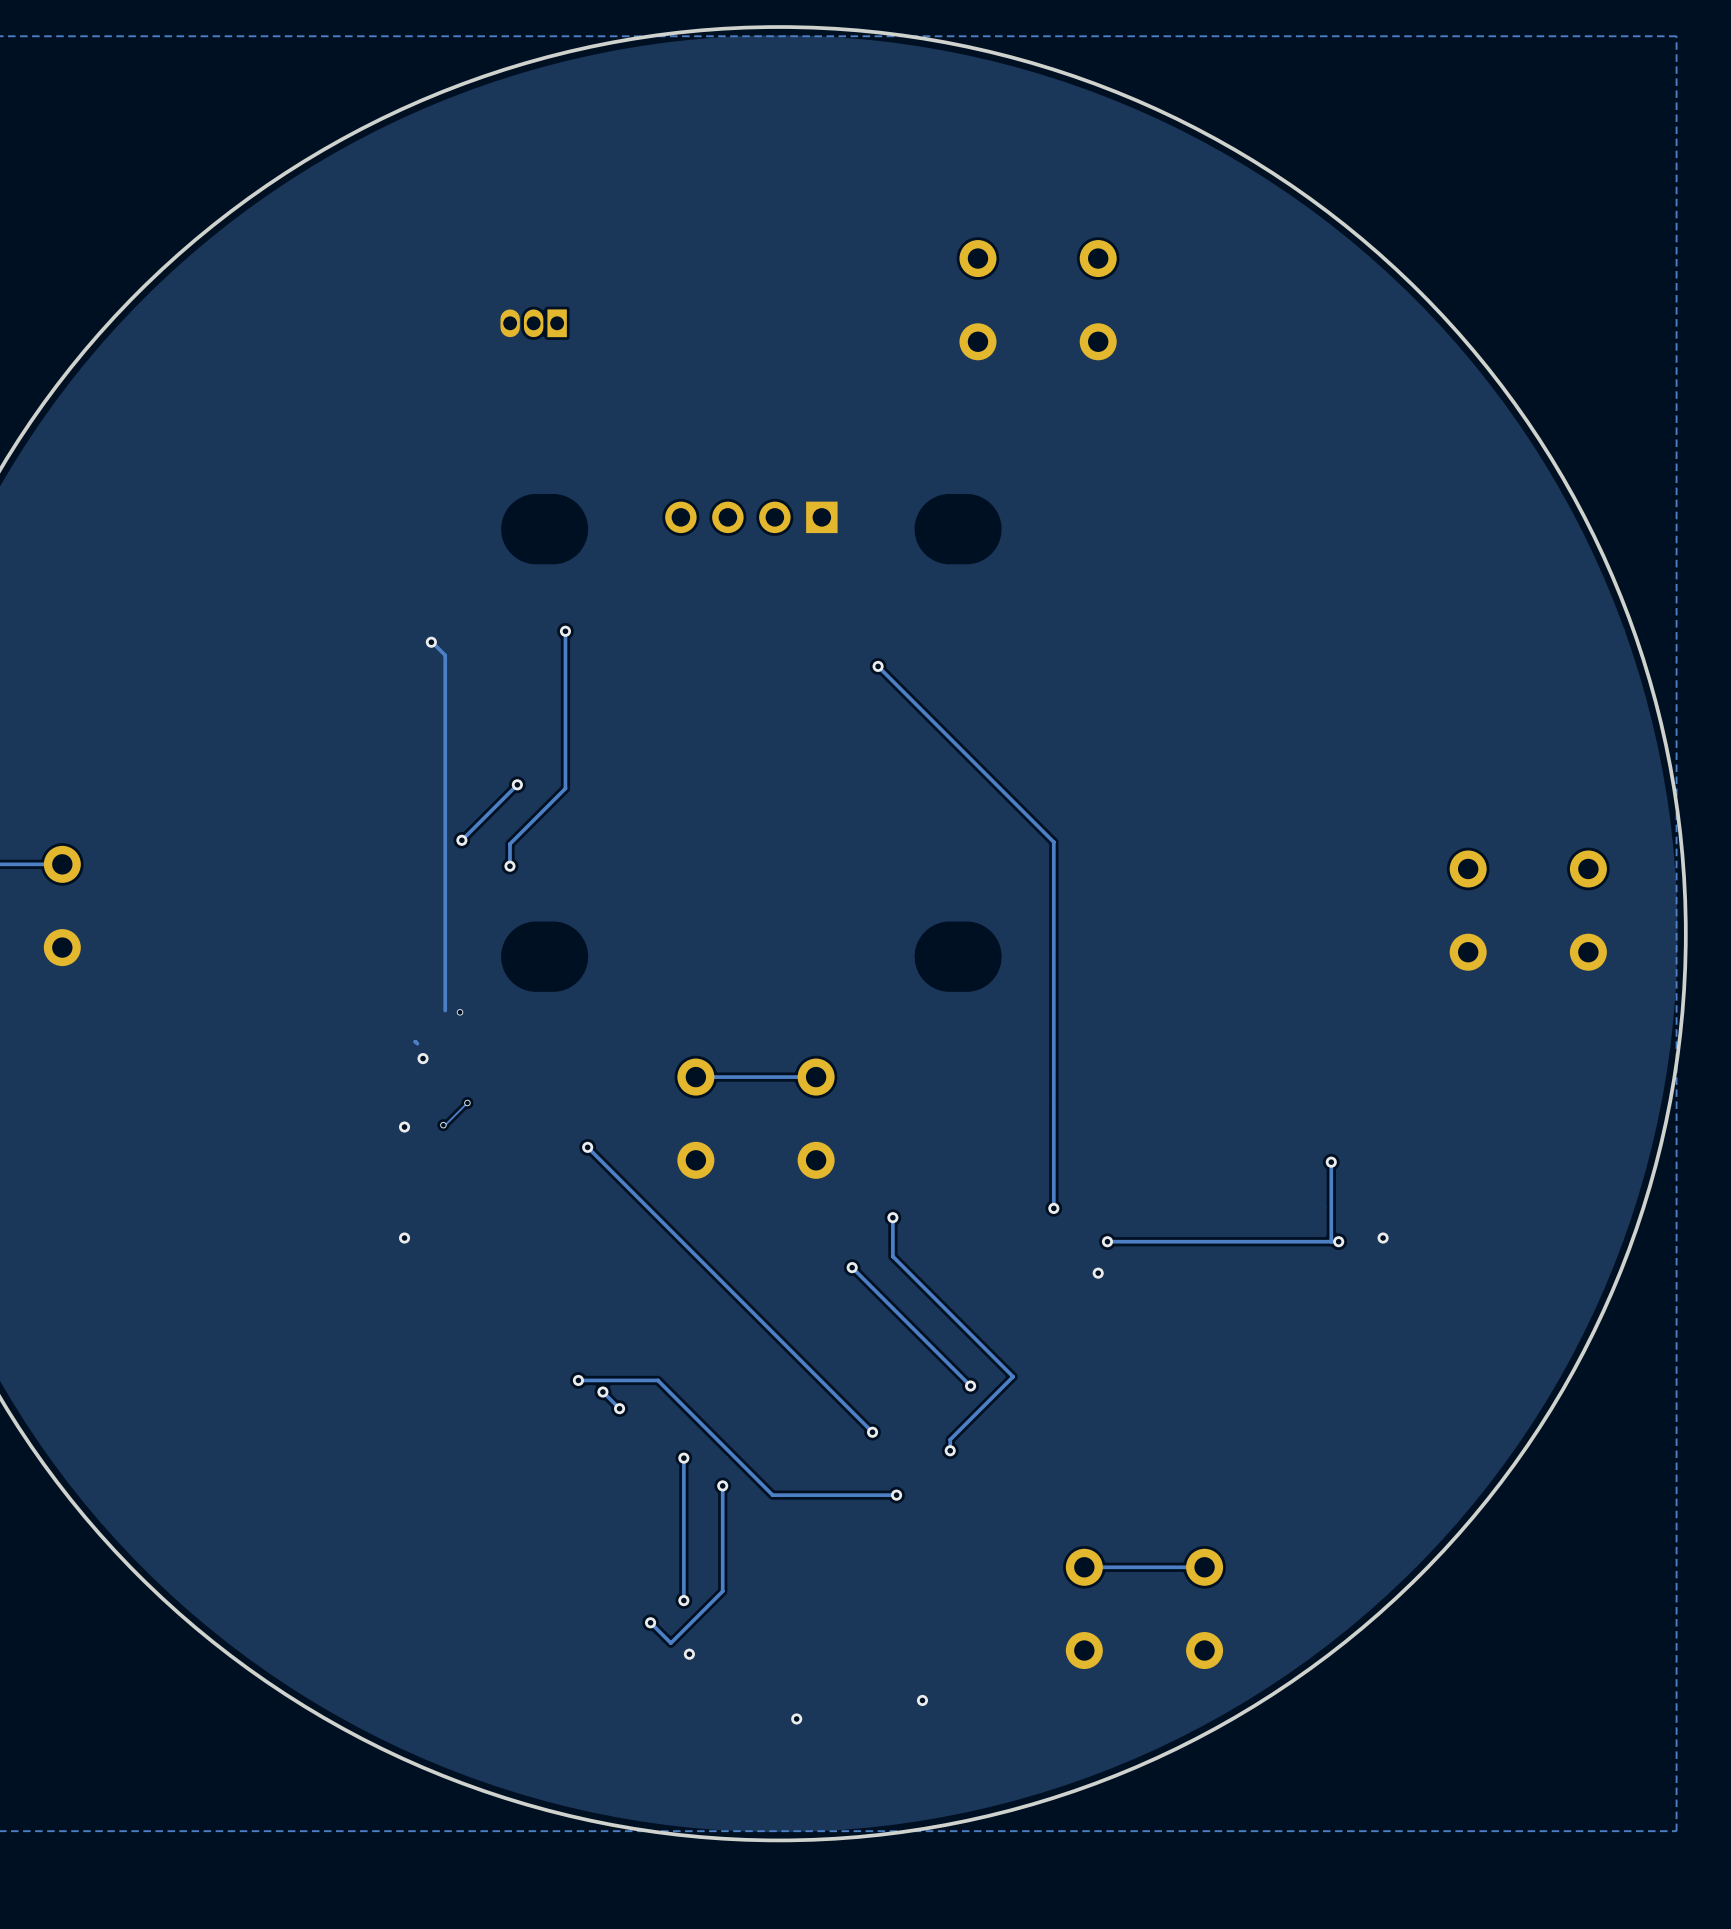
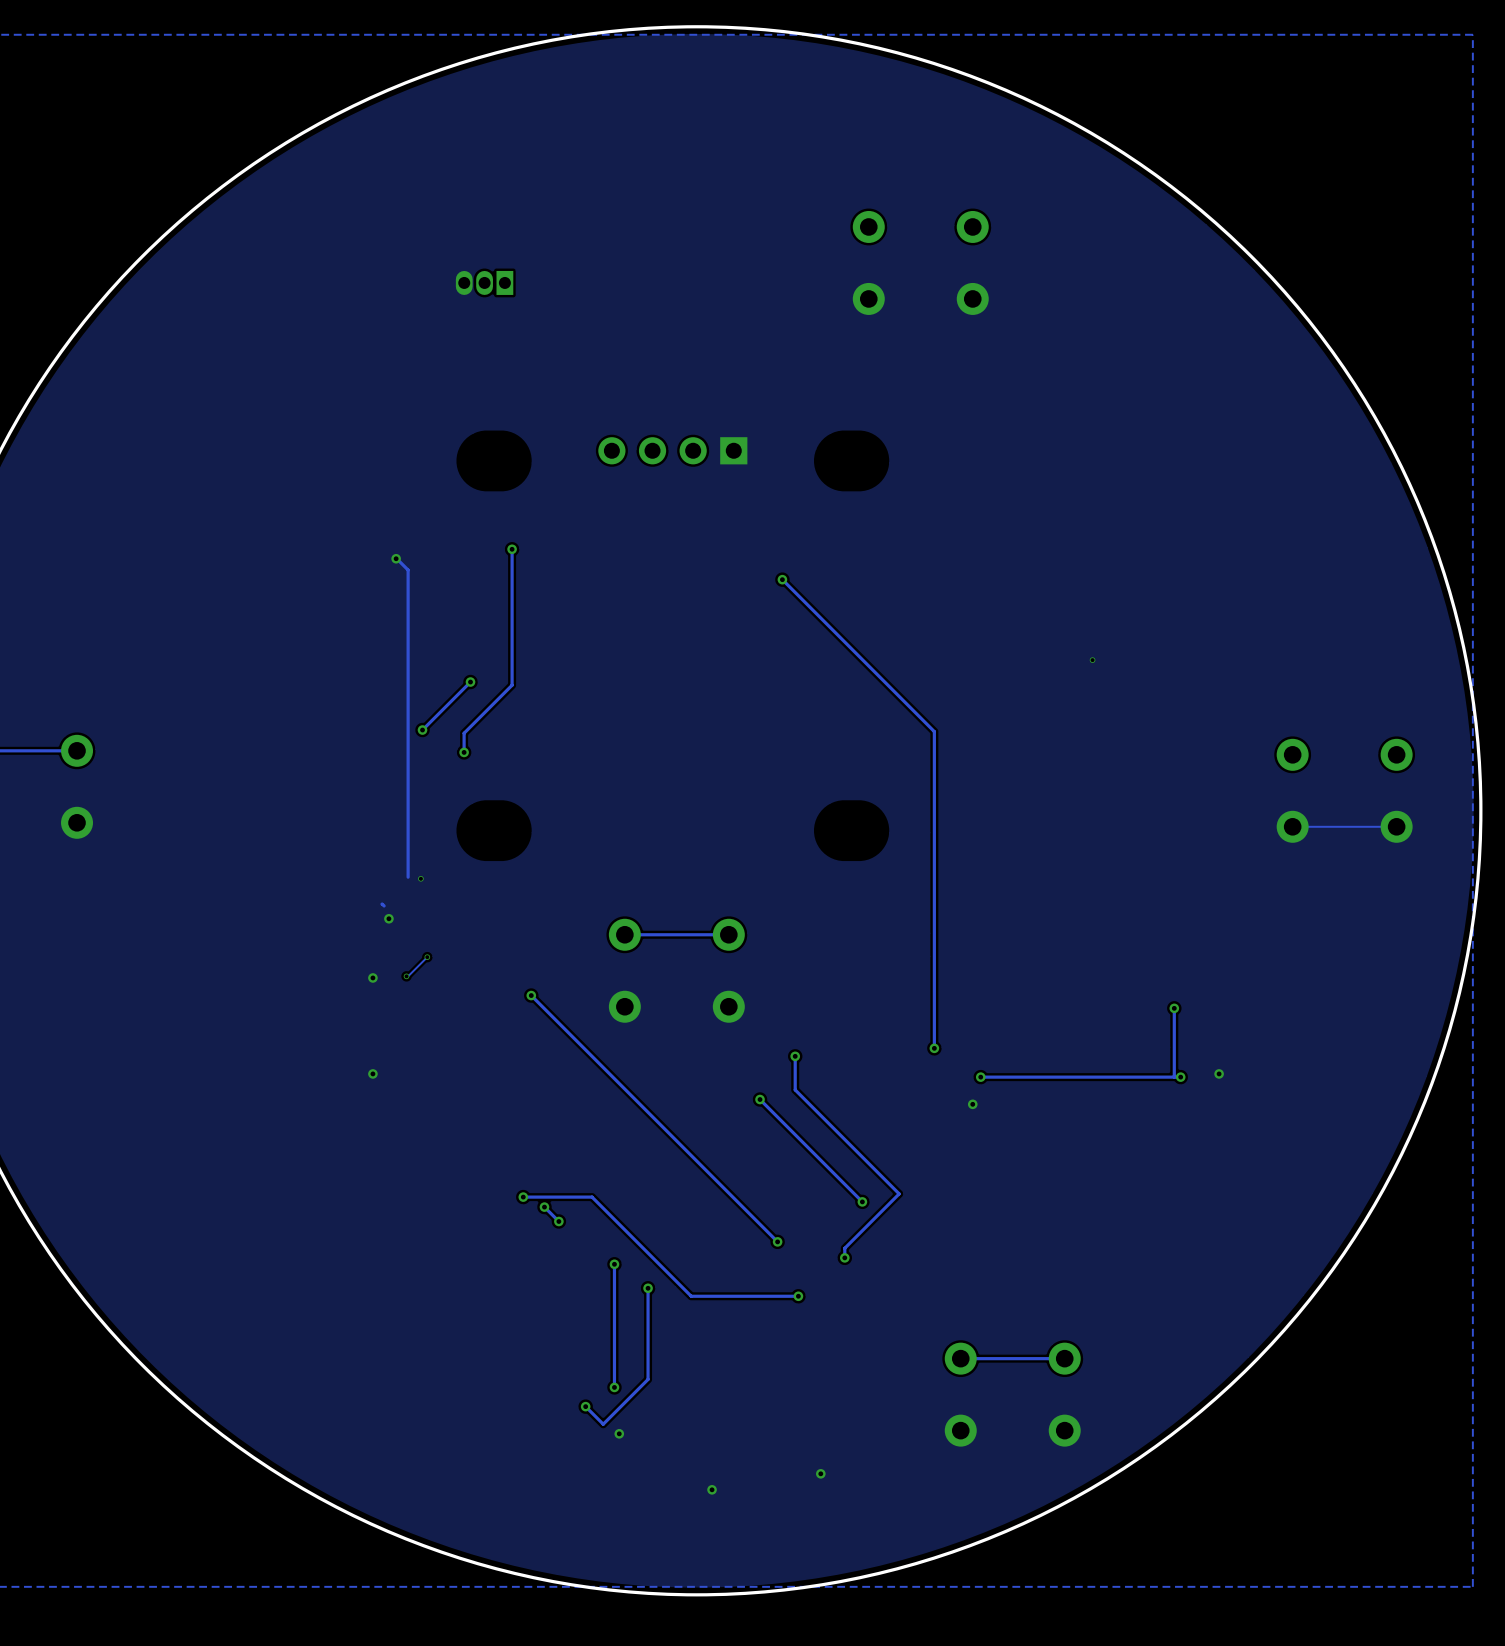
via: none -> (1092, 660)
track: none -> (1396, 826) (1292, 826)

